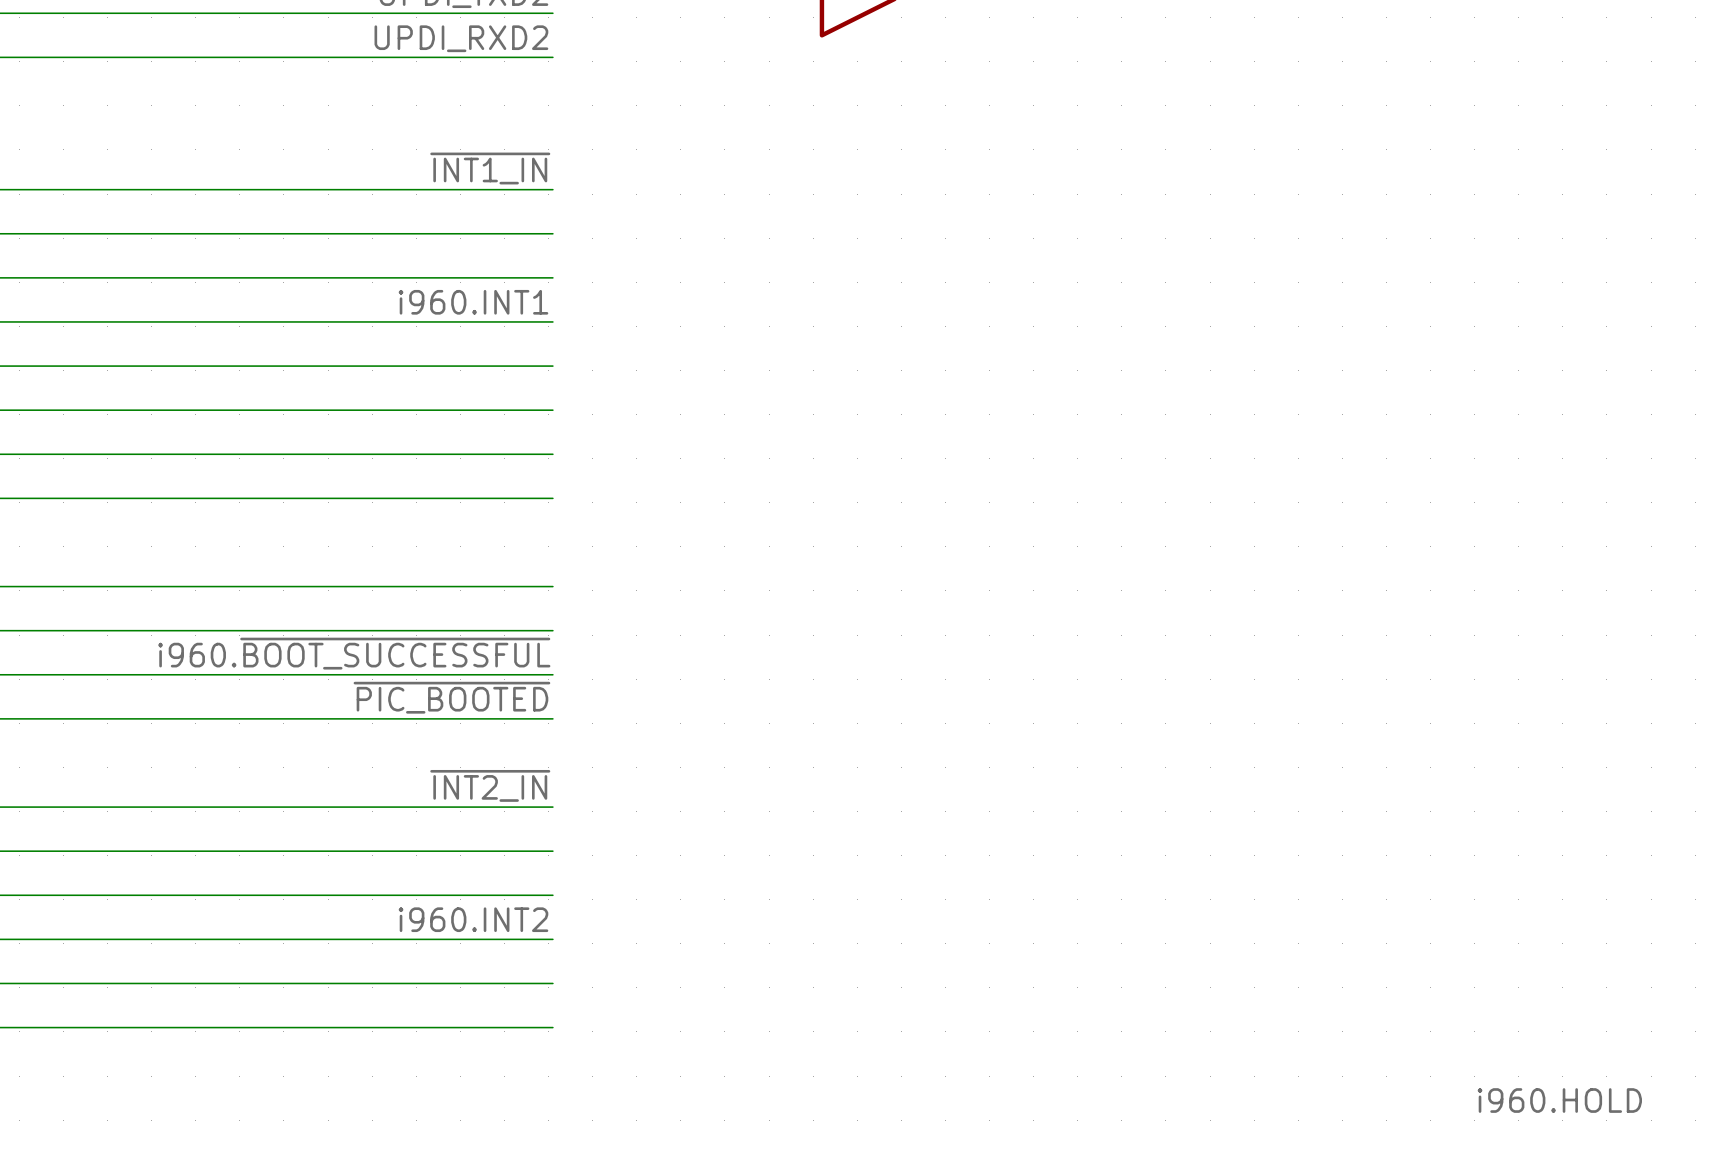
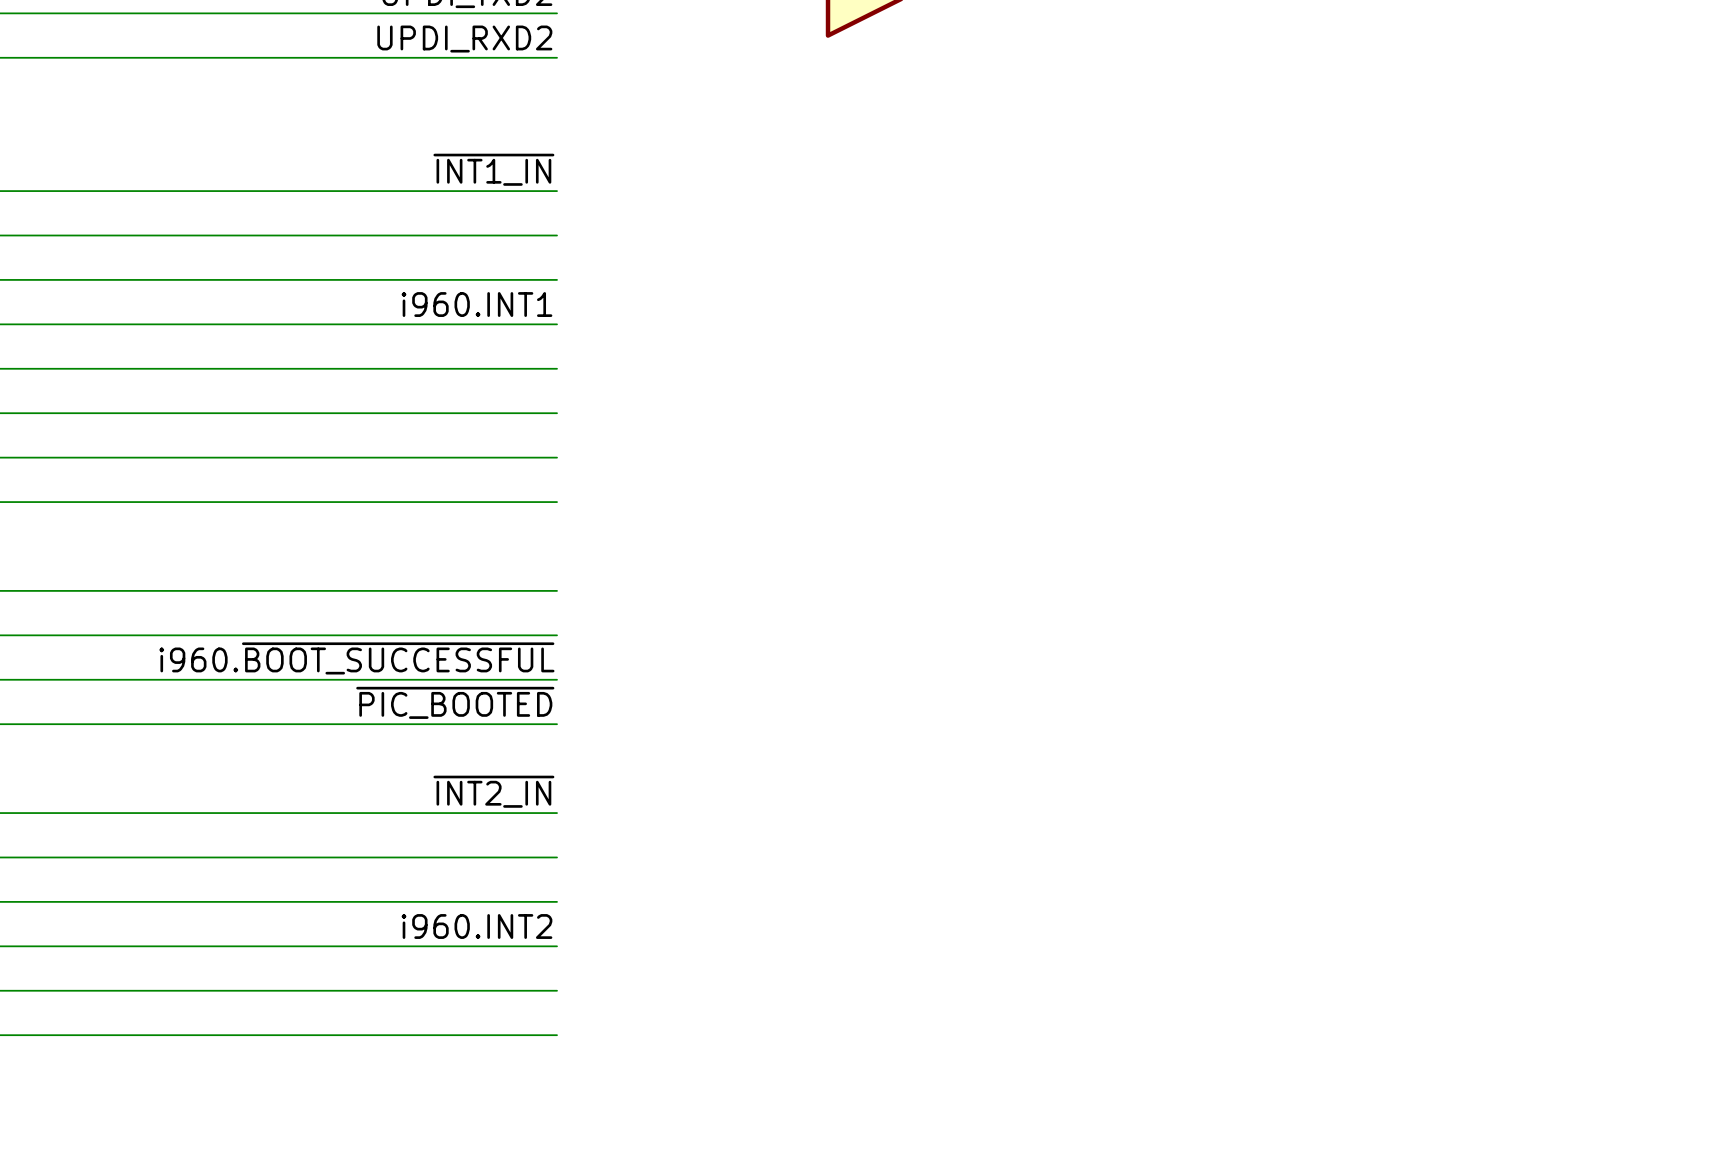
label: i960.HOLD (1559, 1100) -> none

